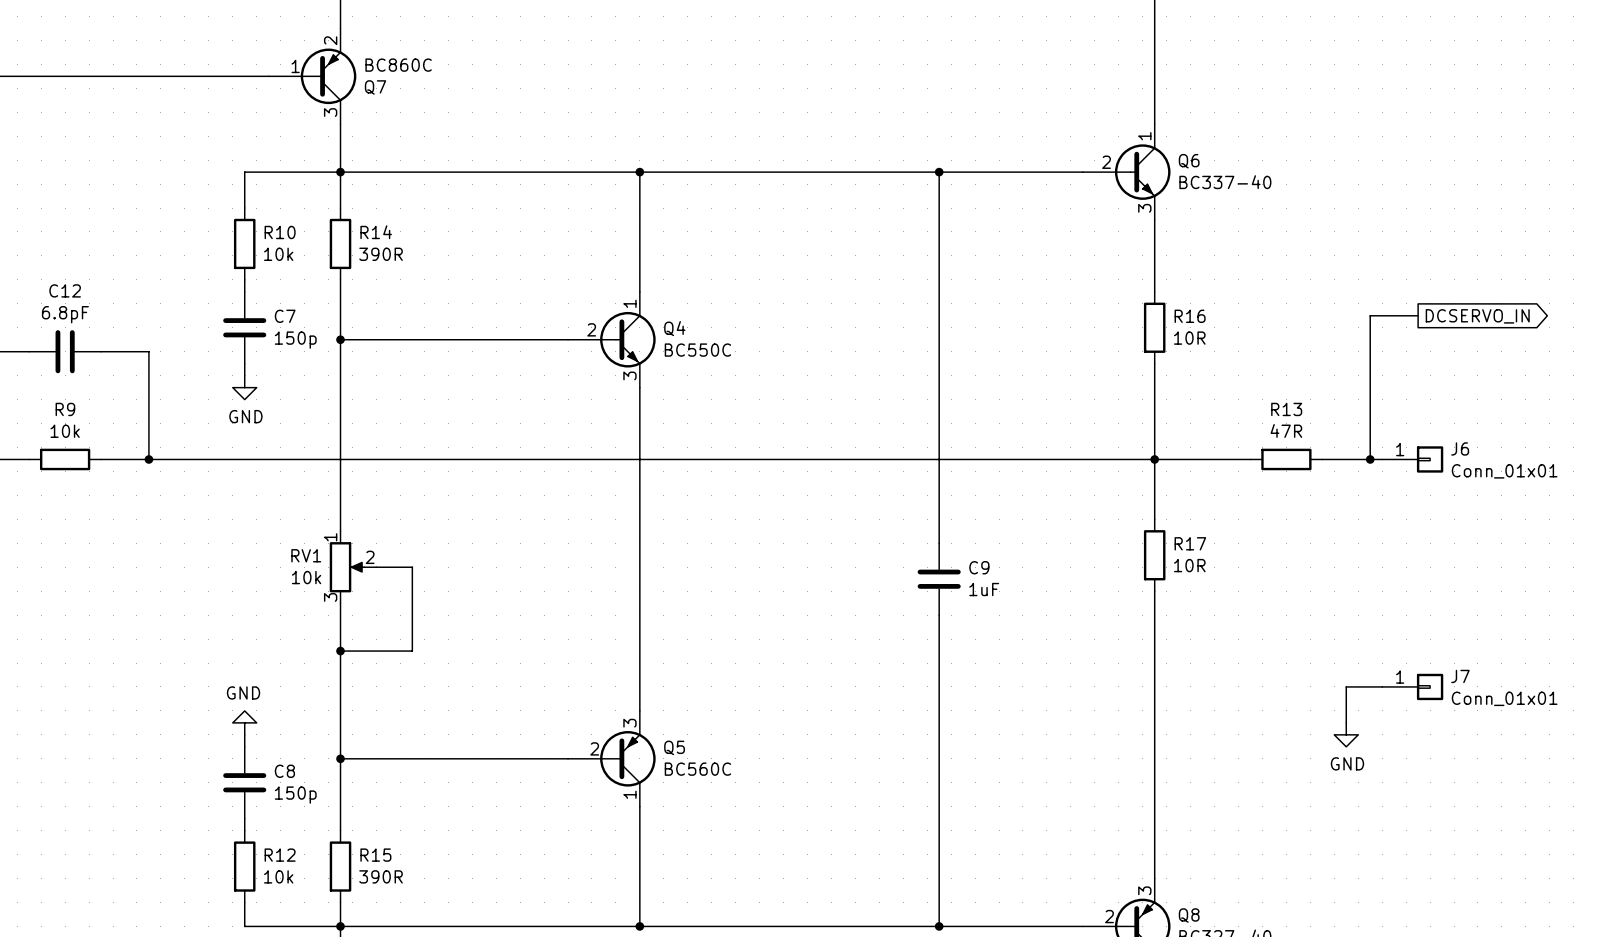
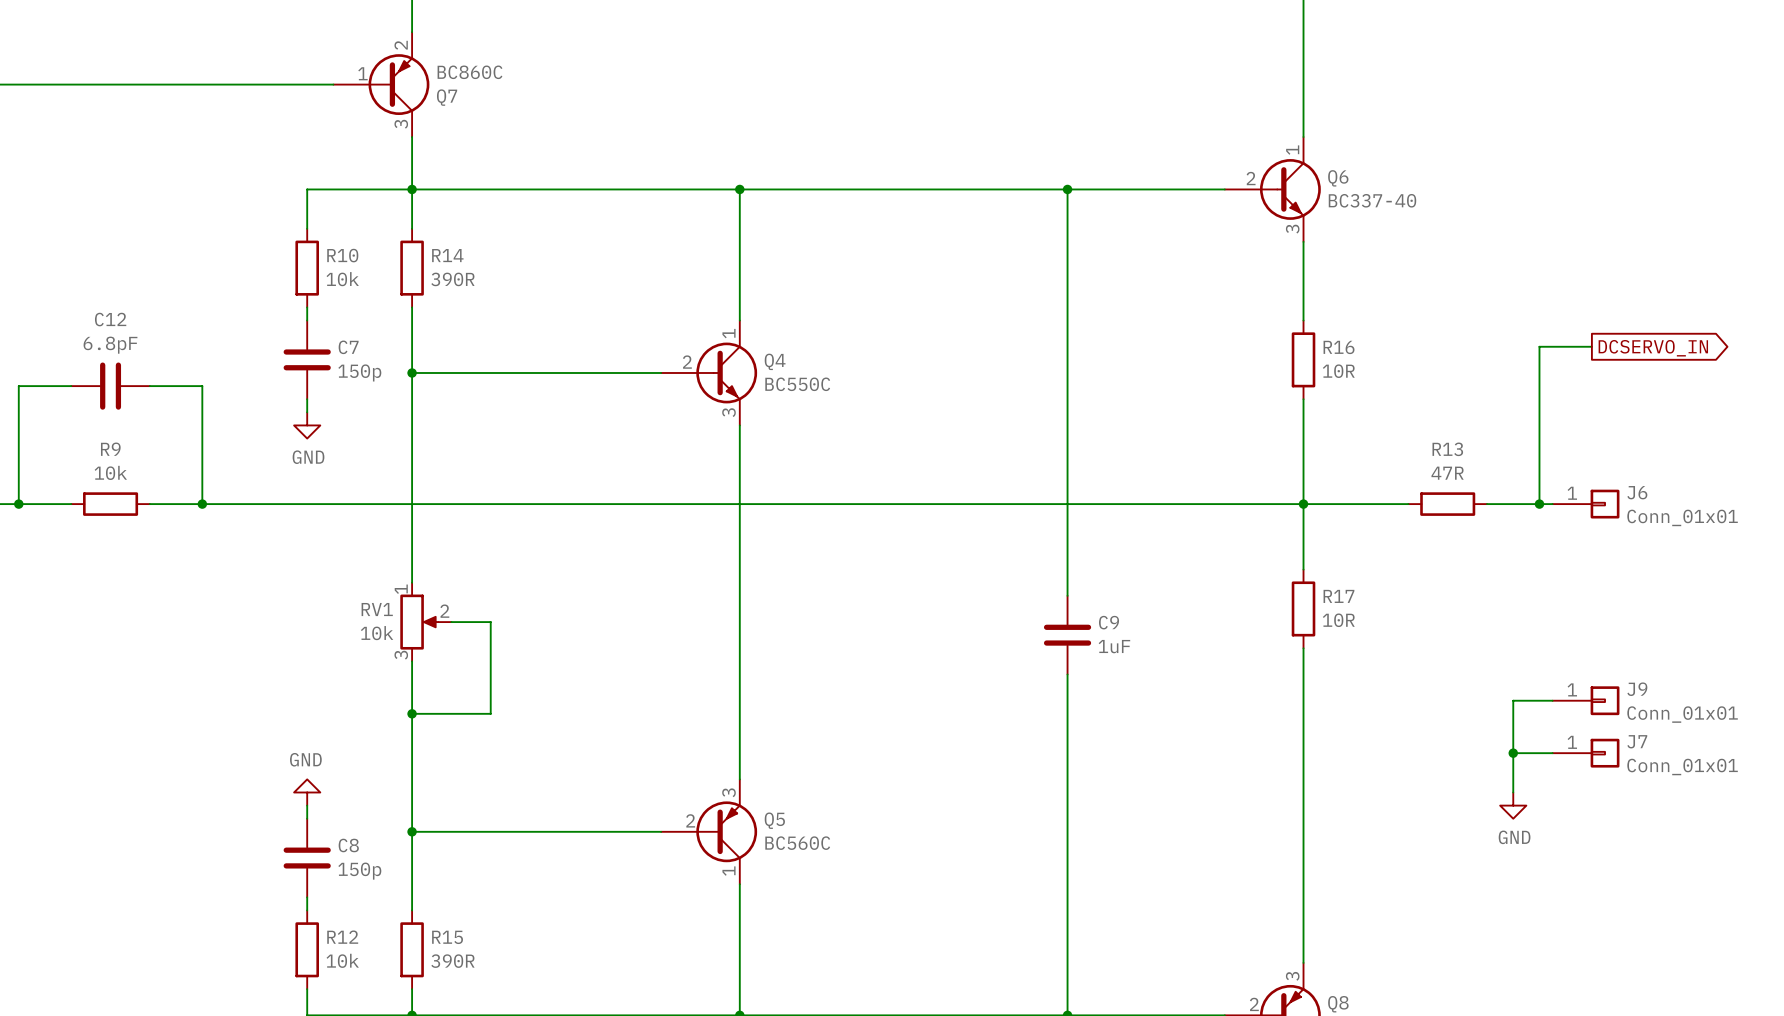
wire: none -> (1552, 700) (1513, 700) (1513, 753)
J9: none -> Conn_01x01 (1586, 700)
junction: none -> (1513, 753)

